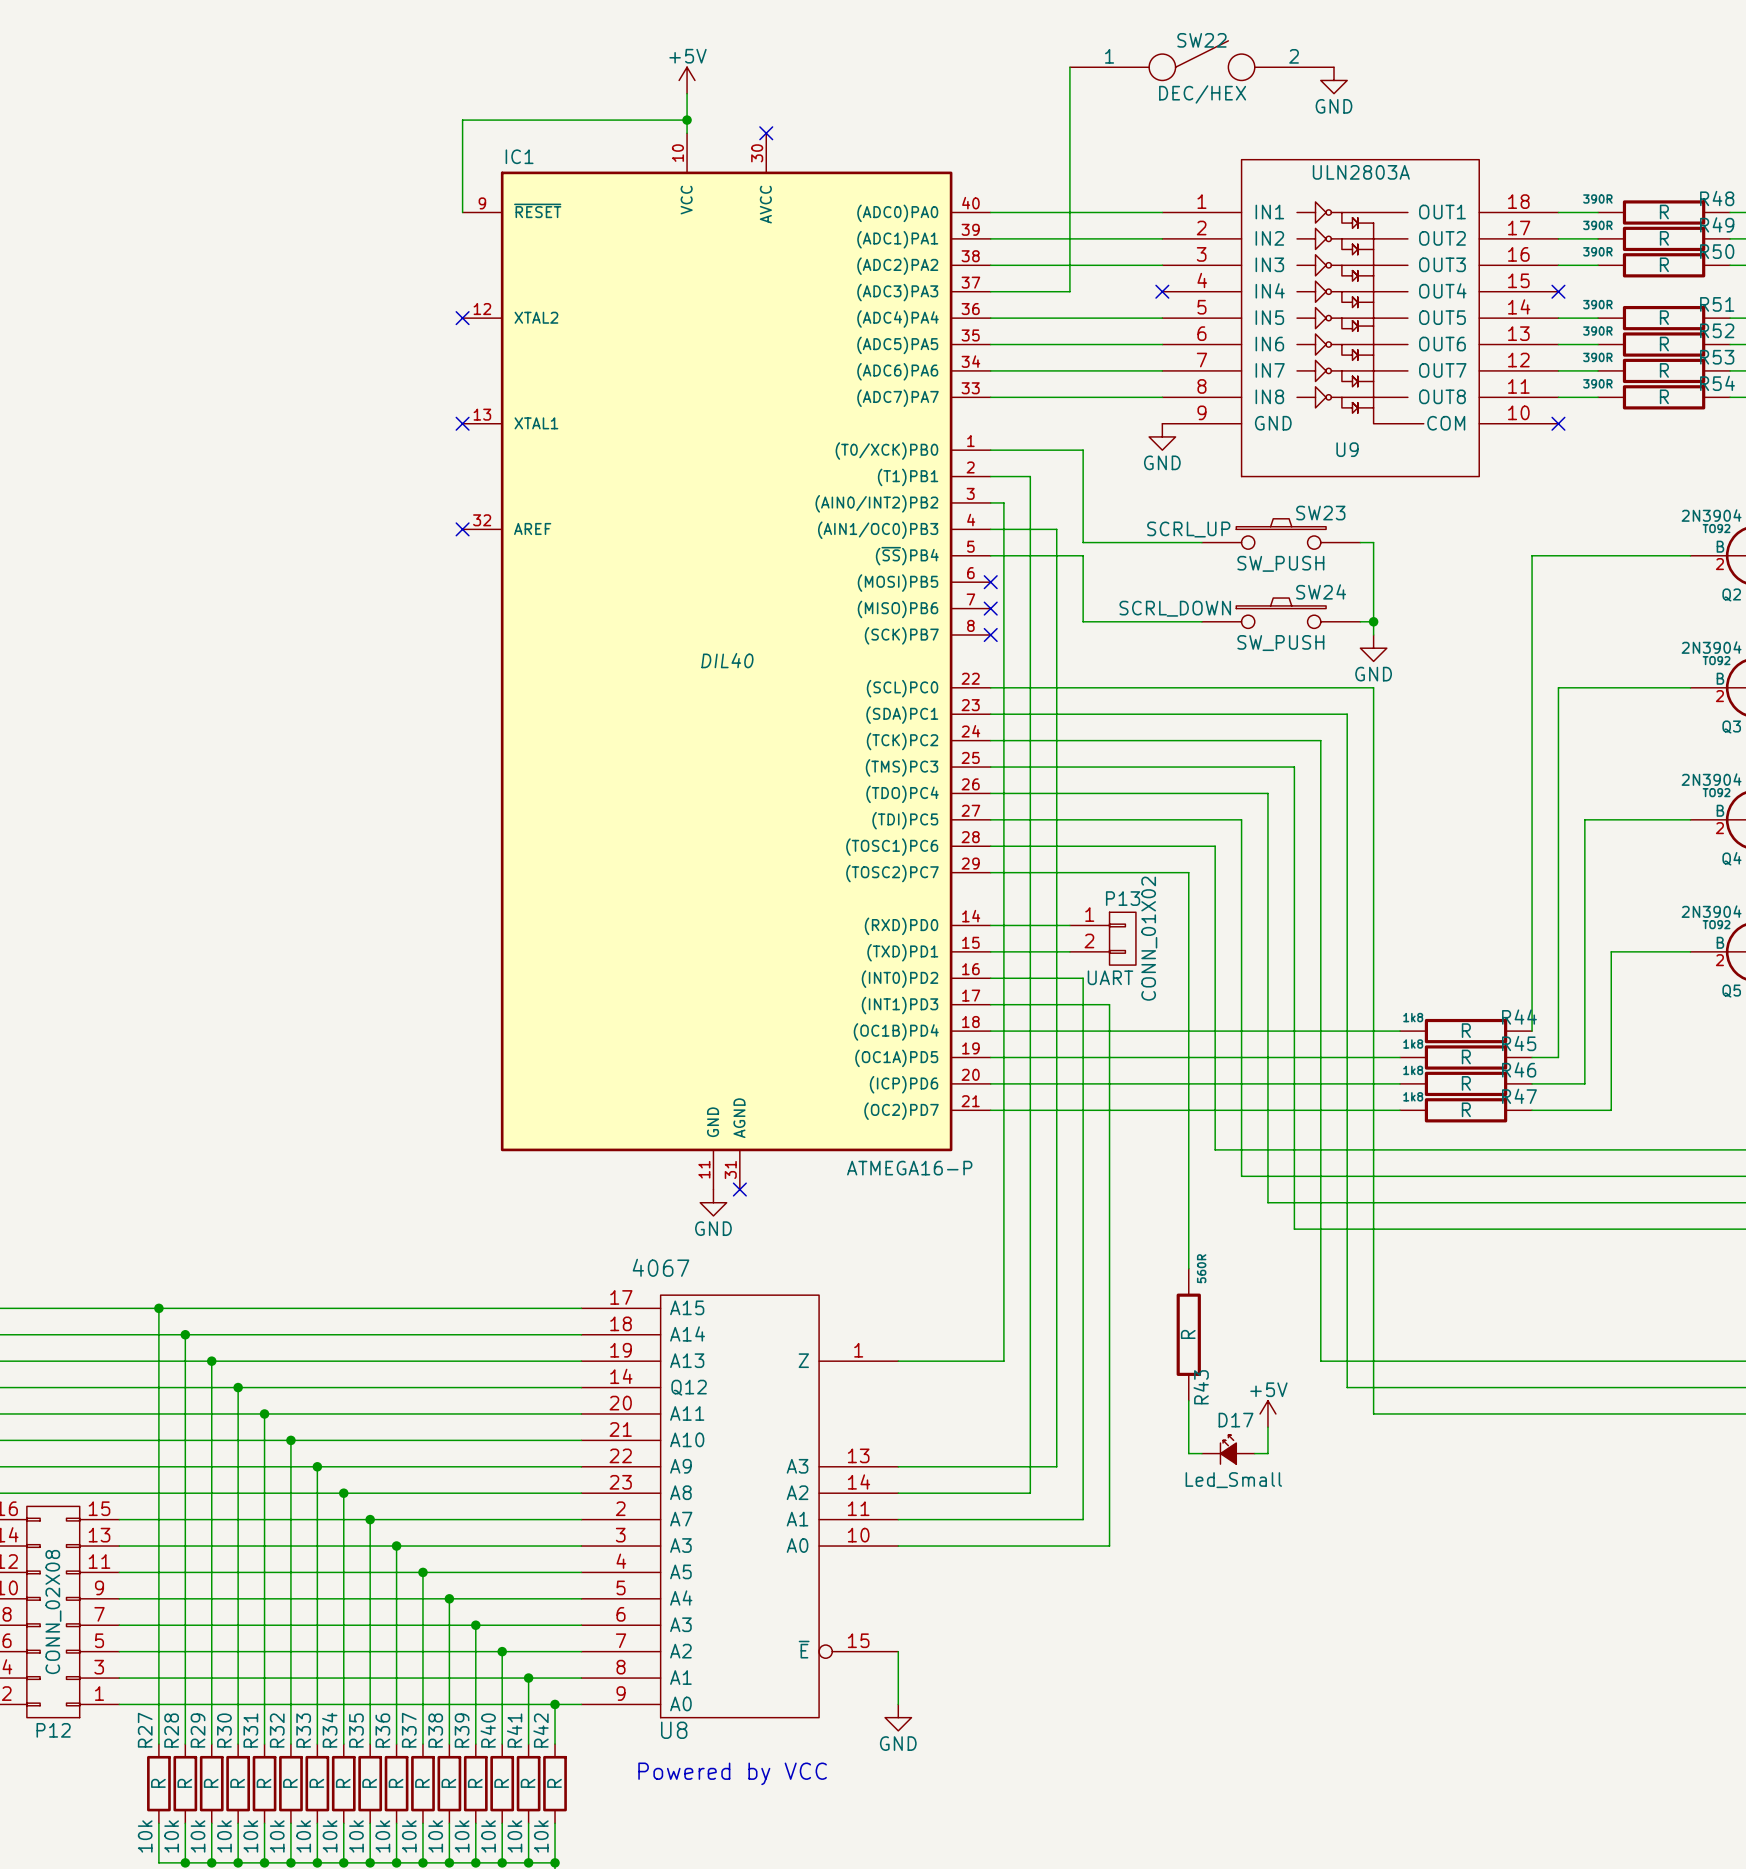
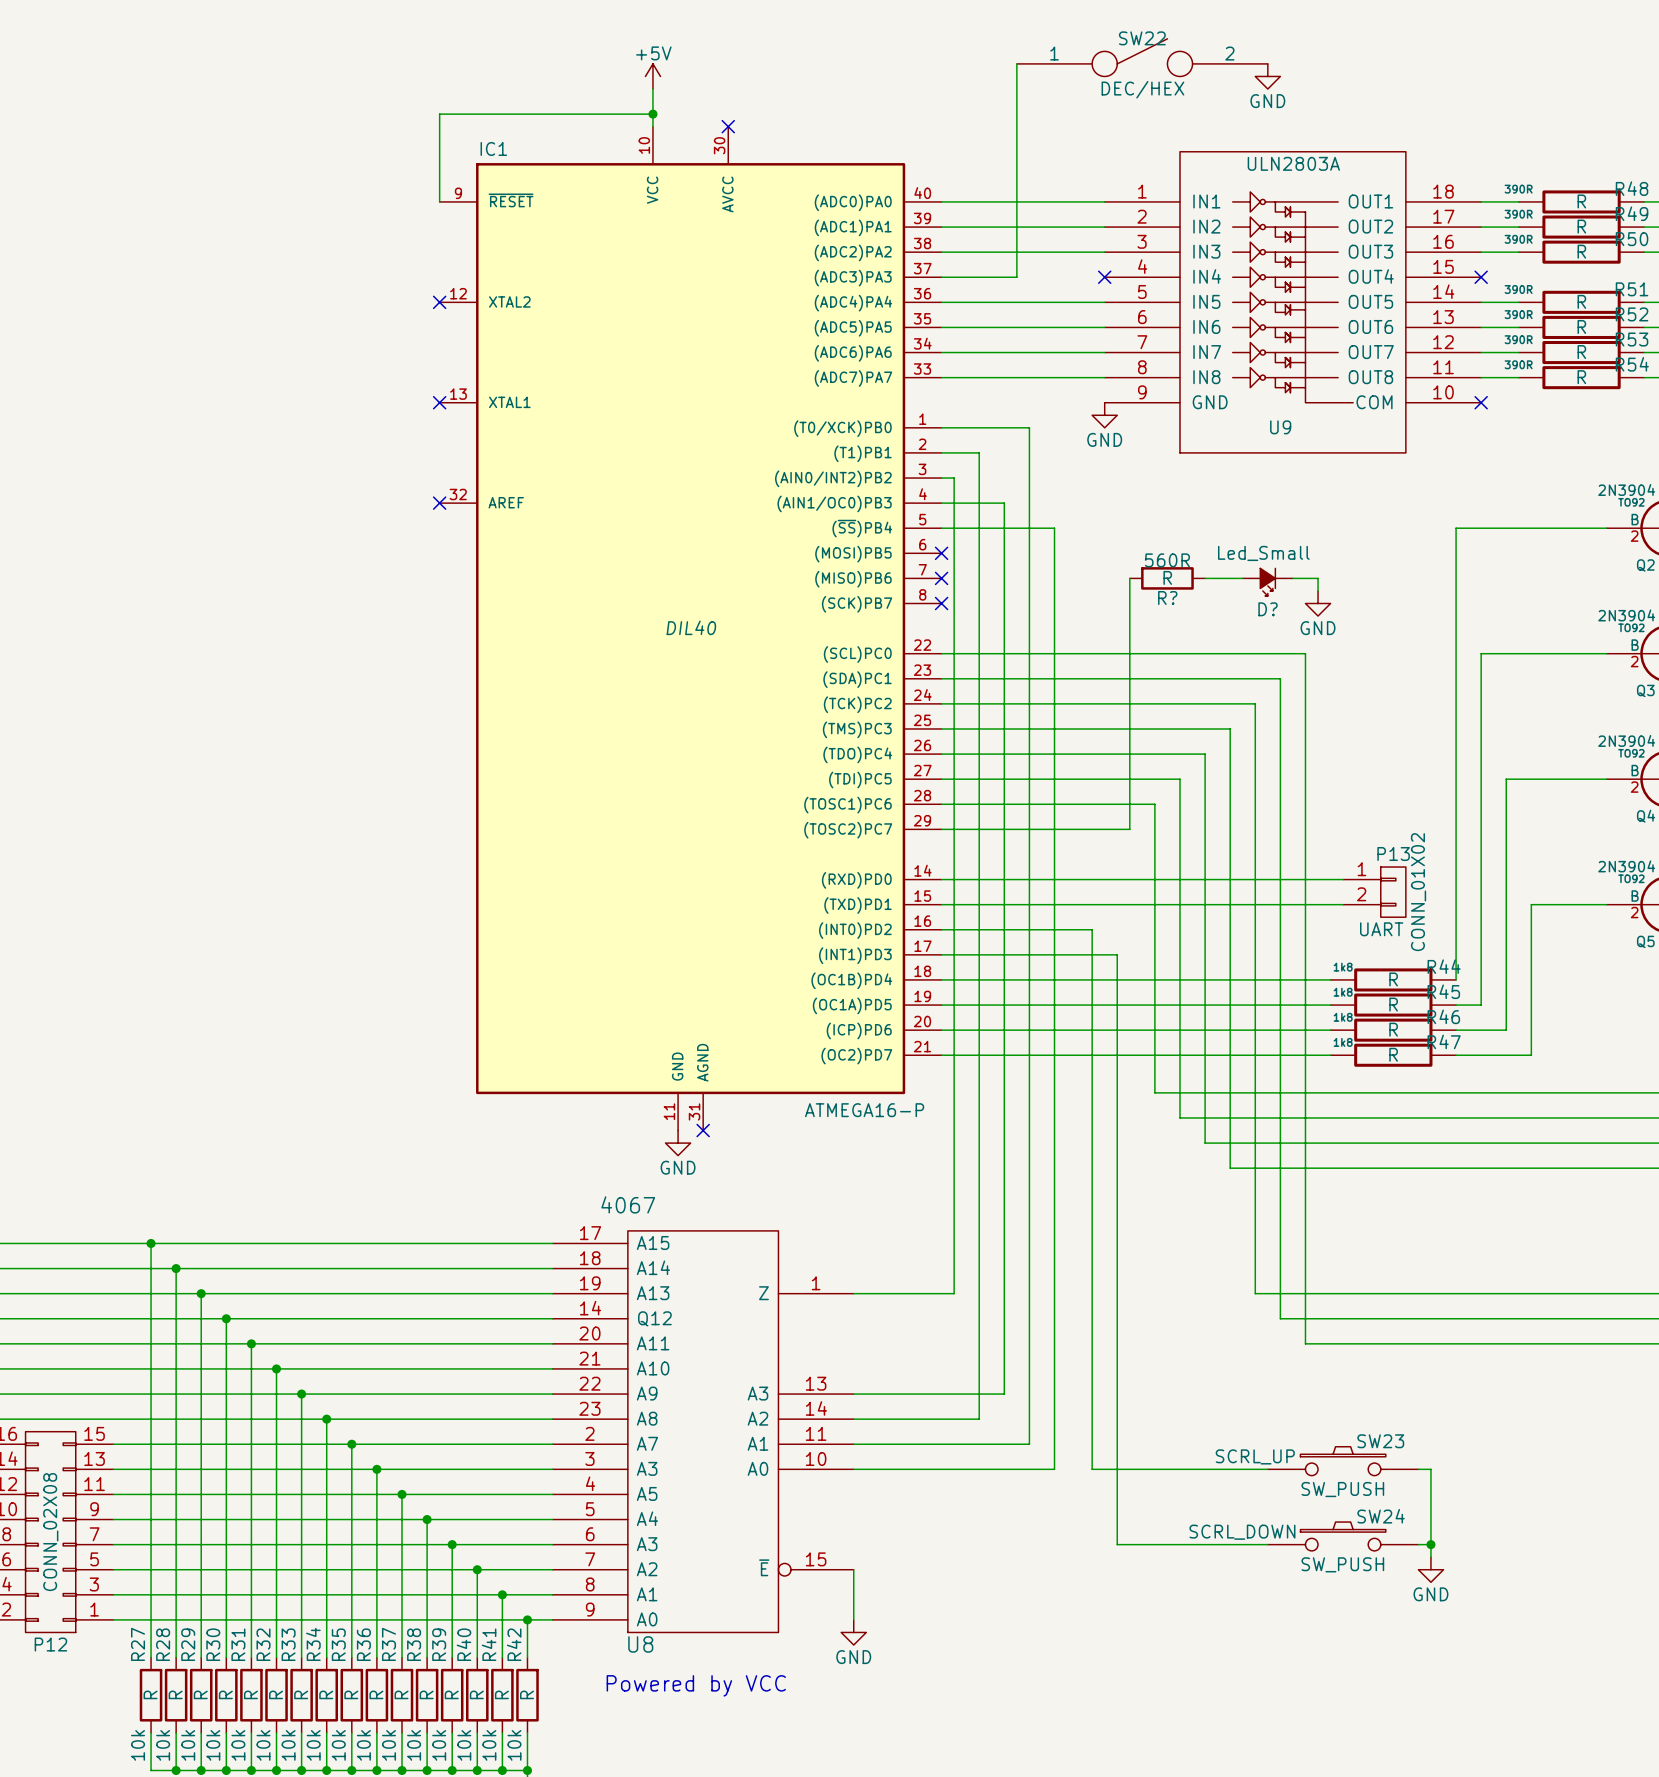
SW23 position: (1281, 533) -> (1343, 1461)
wire: (1083, 542) (1201, 542) -> (1029, 515) (1029, 528) (1054, 528) (1054, 954) (1117, 954) (1117, 1544) (1267, 1544)
wire: (1360, 542) (1373, 542) (1373, 634) -> none
R?: none -> R (1167, 578)
wire: none -> (1292, 578) (1318, 578) (1318, 590)
D?: none -> Led_Small (1267, 582)
SW24 position: (1281, 613) -> (1343, 1536)
wire: (1083, 621) (1201, 621) -> (1029, 590) (1029, 929) (1092, 929) (1092, 1469) (1267, 1469)
wire: (1360, 621) (1373, 621) -> none
junction: (1373, 621) -> none
power symbol position: GND (1373, 648) -> GND (1318, 603)
wire: (1188, 872) (1188, 1268) -> (1129, 829) (1129, 578)
wire: none -> (1016, 879) (1343, 879)
P13 position: (1102, 938) -> (1374, 892)
wire: none -> (1016, 904) (1343, 904)
R43: R (1188, 1334) -> none
wire: (1188, 1400) (1188, 1453) (1201, 1453) -> none
power symbol: +5V (1267, 1413) -> none
wire: (1267, 1427) (1267, 1453) (1254, 1453) -> none
D17: Led_Small (1228, 1449) -> none
wire: none -> (1418, 1469) (1430, 1469) (1430, 1557)
wire: none -> (1418, 1544) (1430, 1544)
junction: none -> (1430, 1544)
power symbol: none -> GND (1430, 1569)

